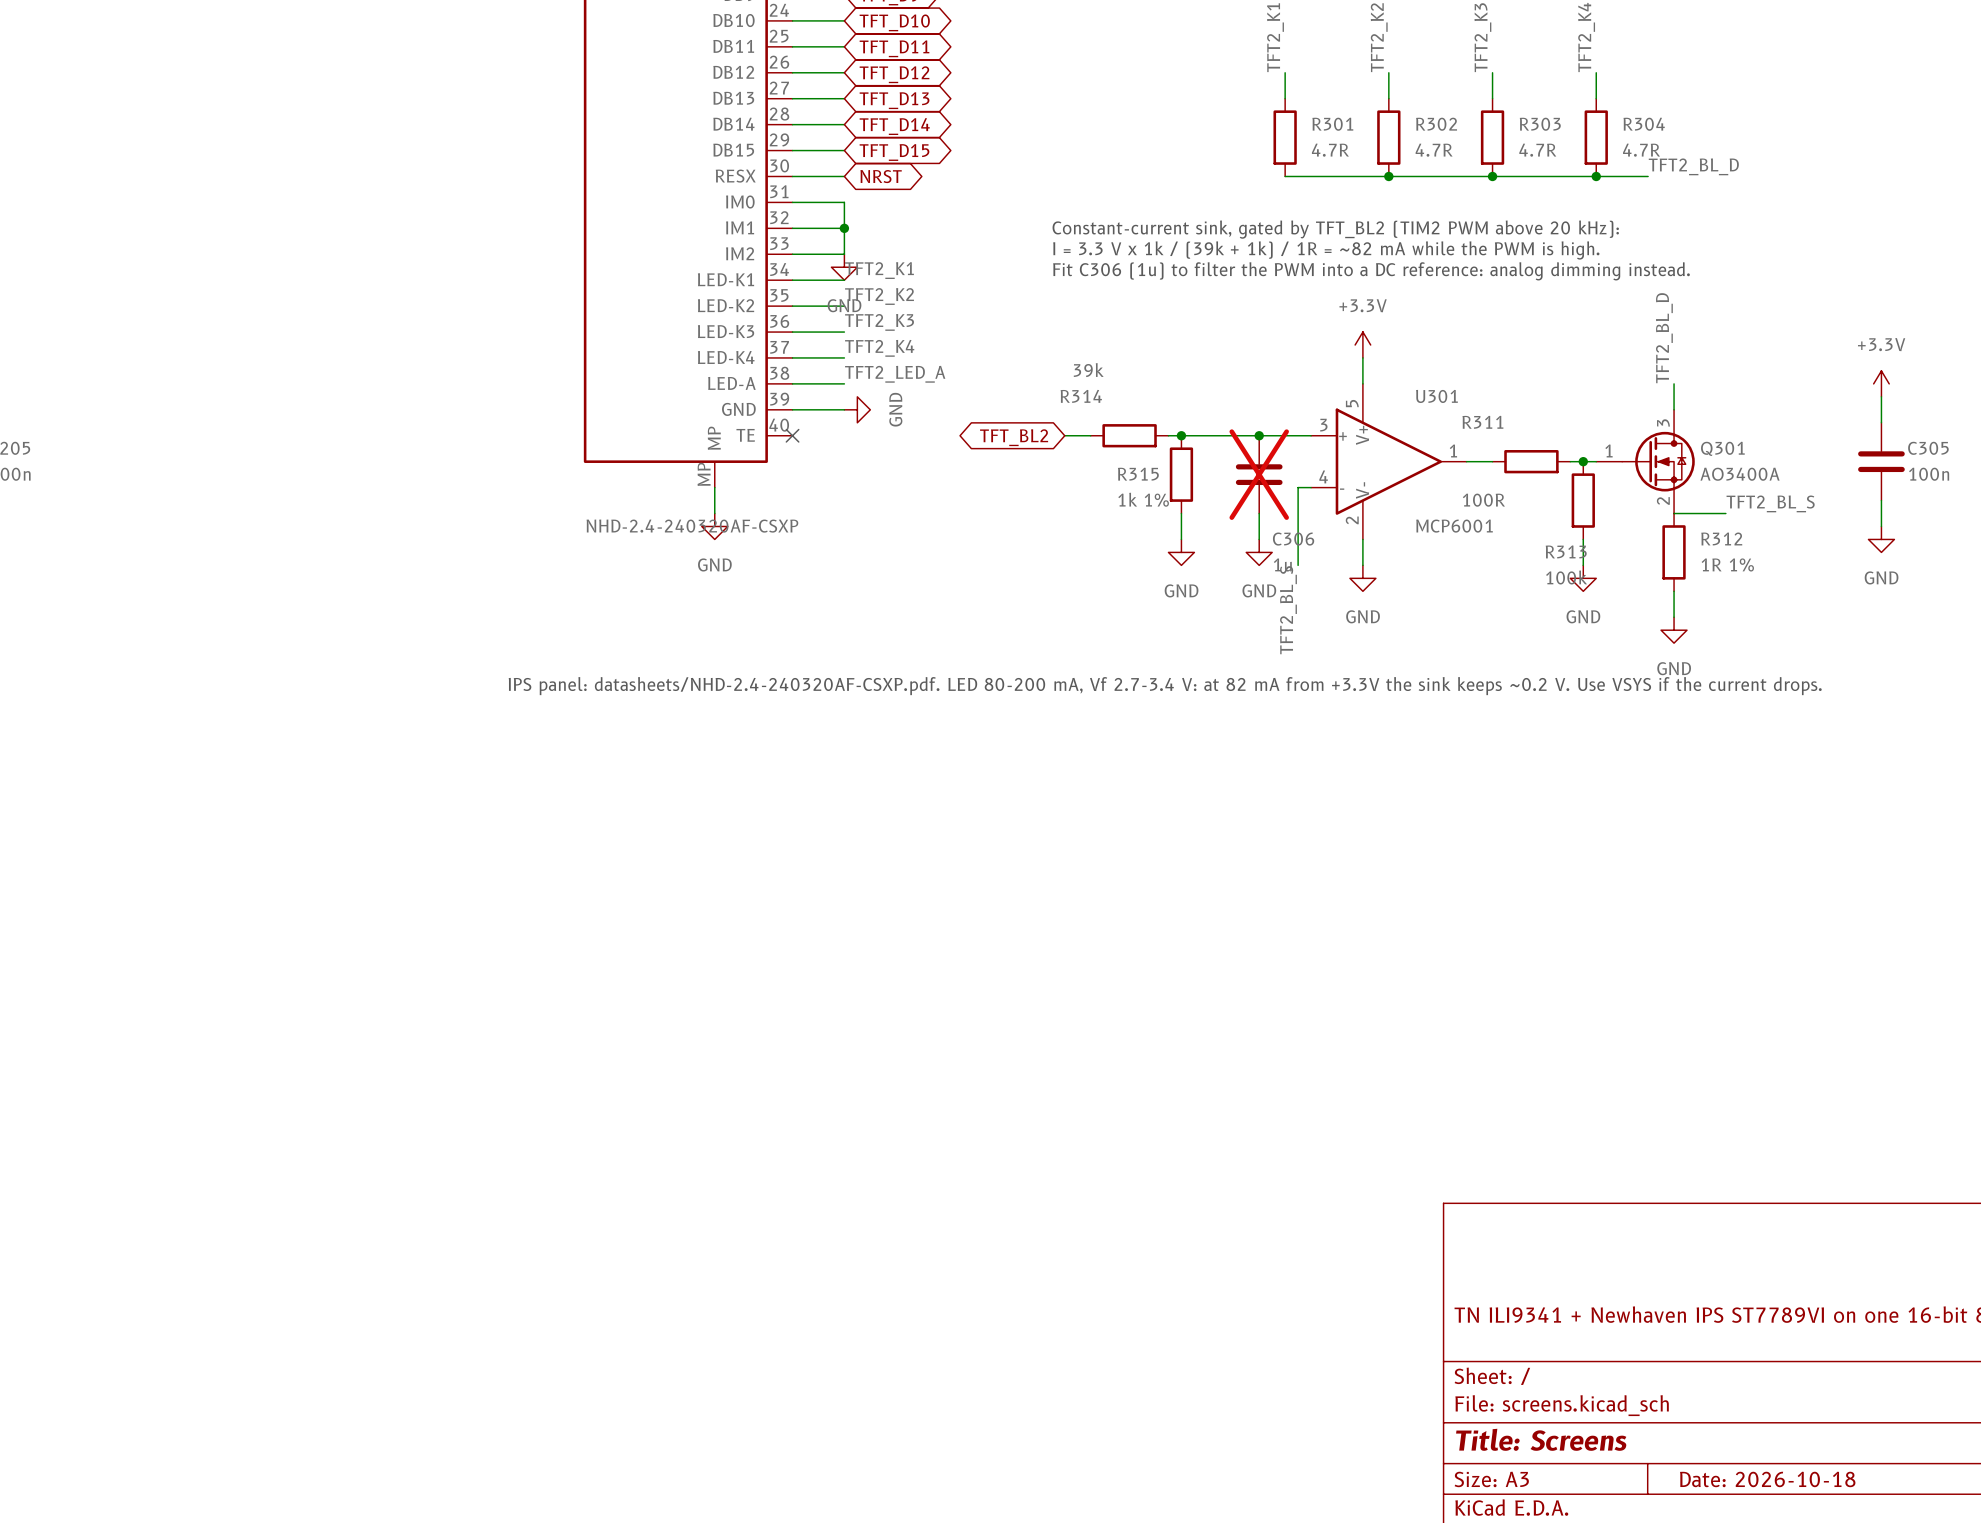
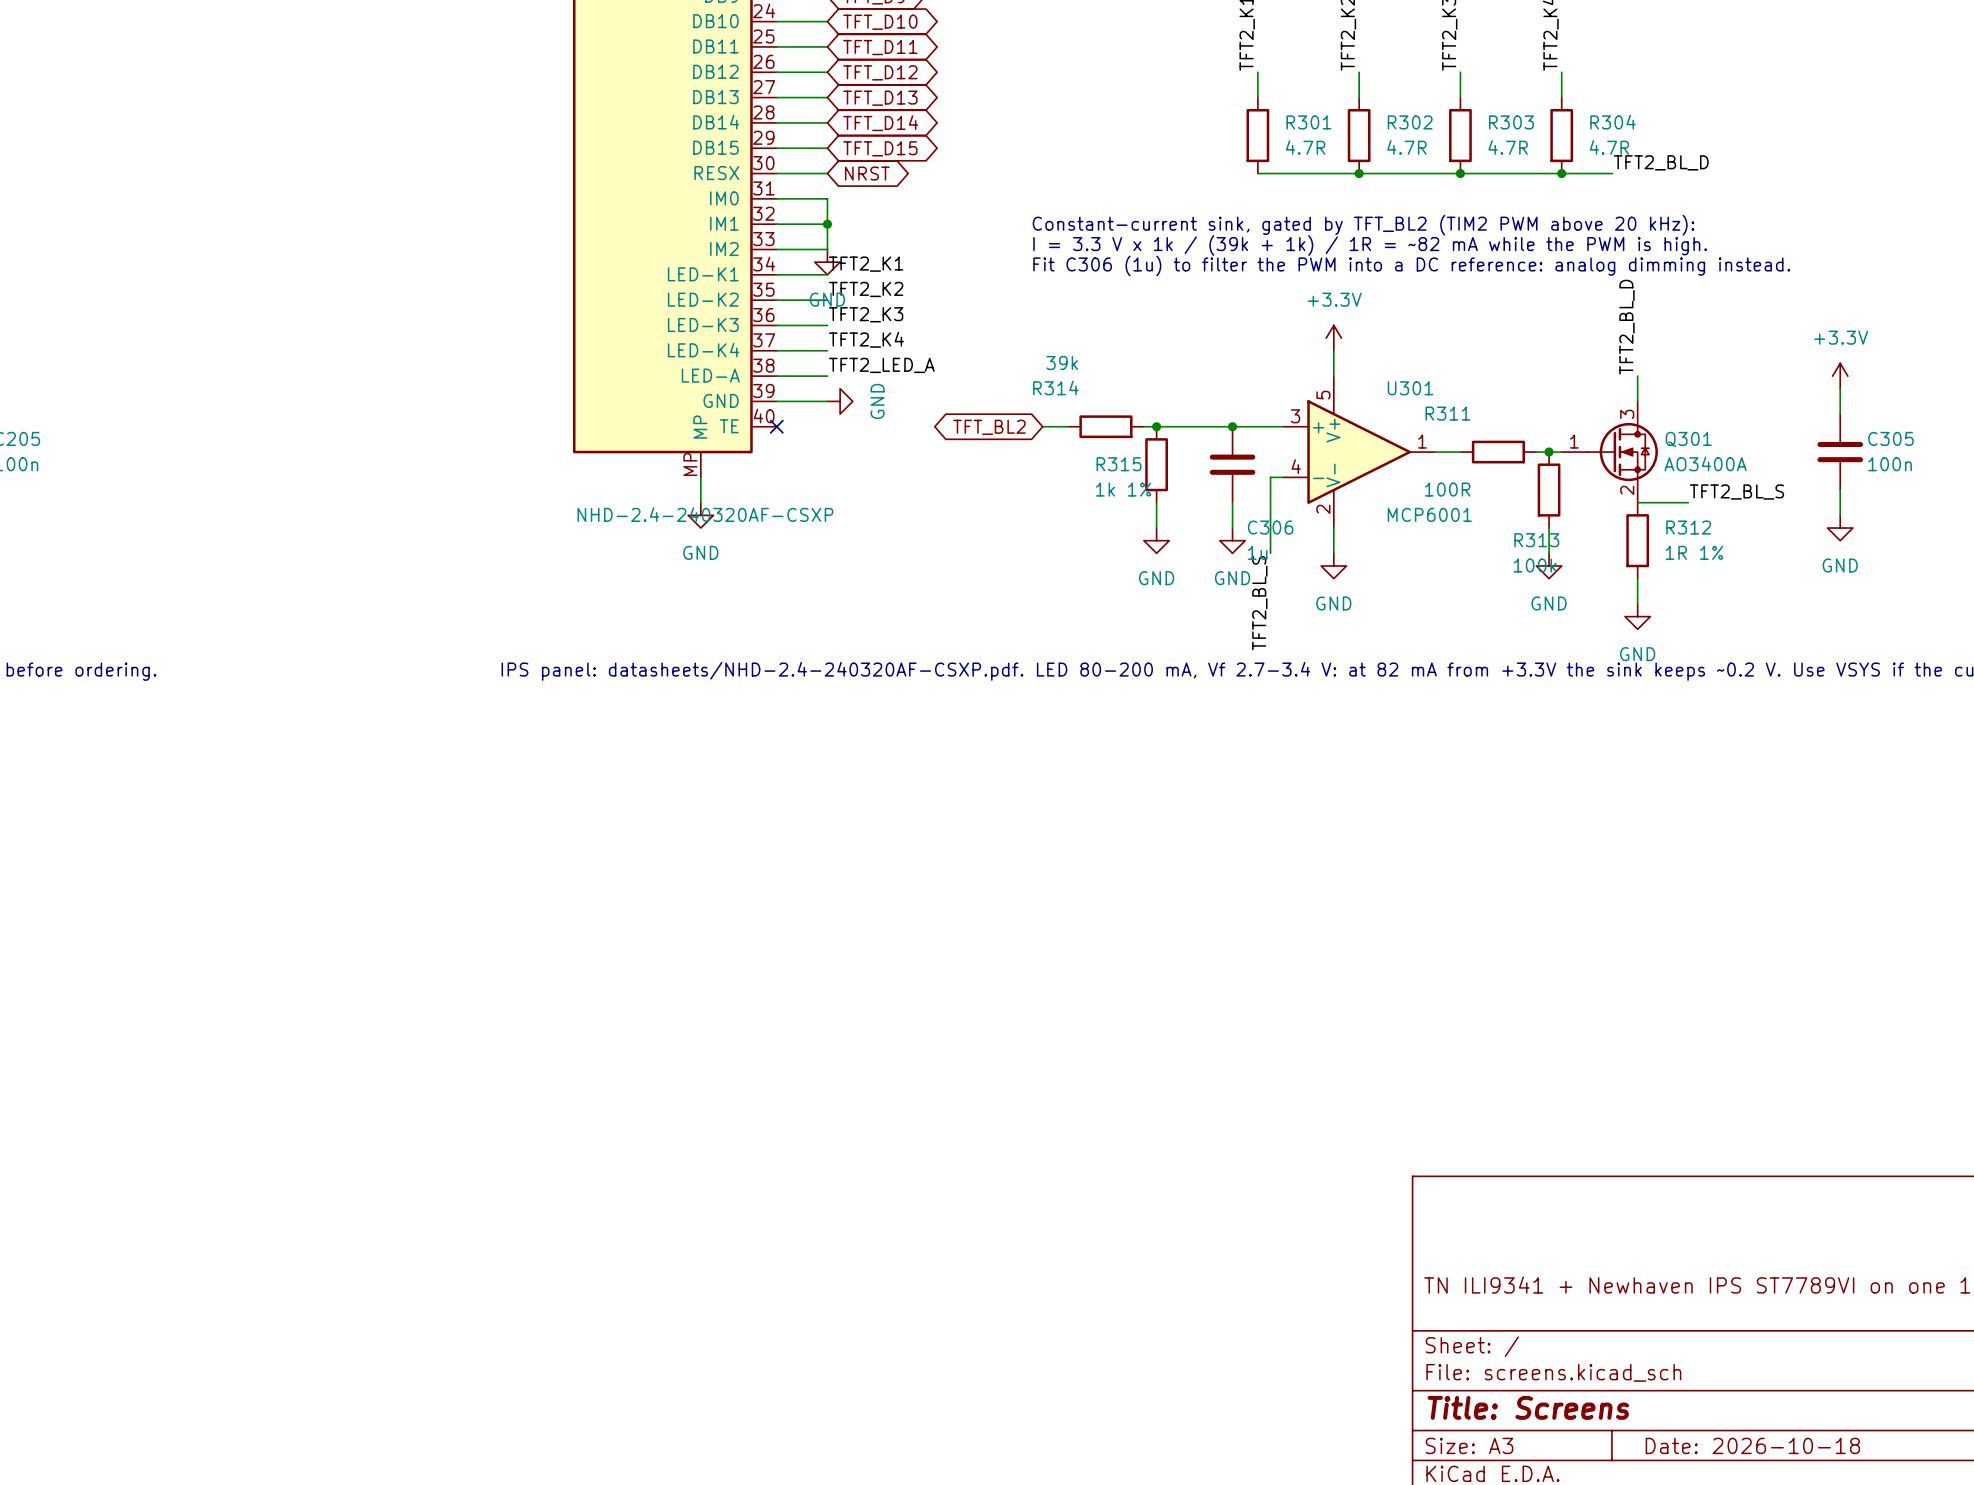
C306 do-not-place cross: (1259, 474) -> none

